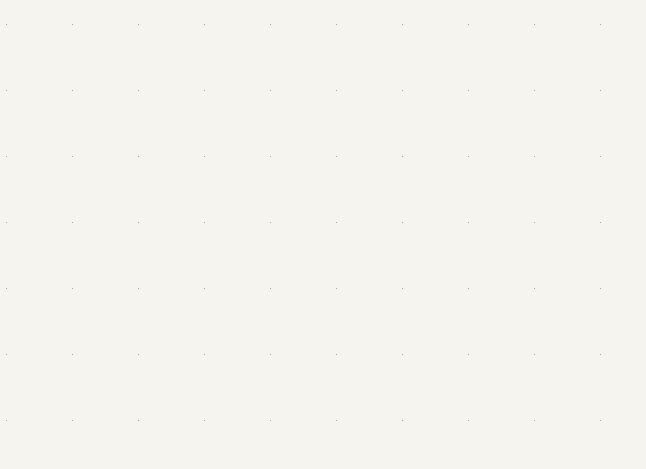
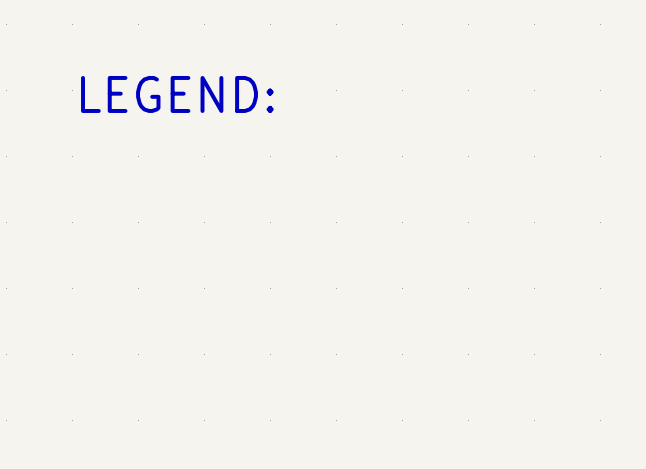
text: none -> LEGEND: (177, 94)

